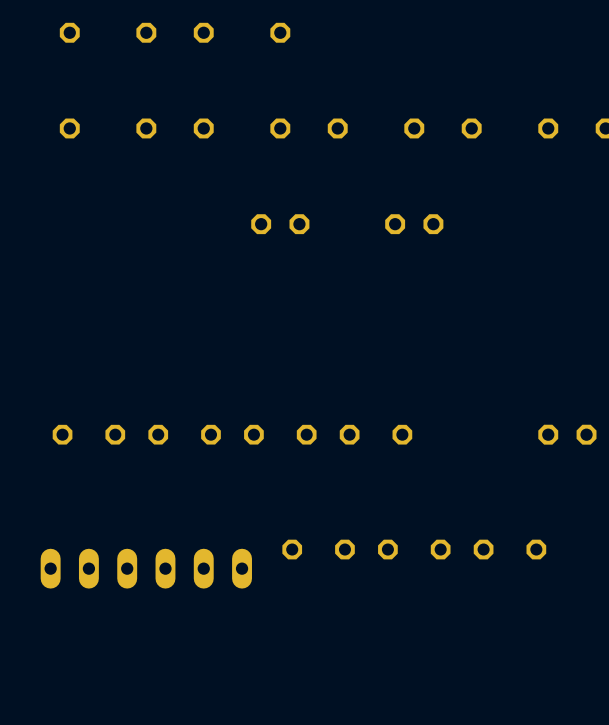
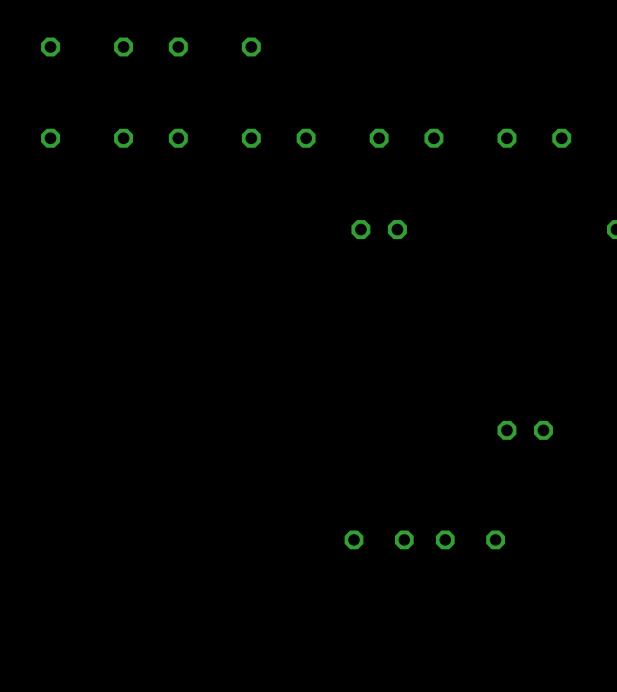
part: (280, 224) -> none
part: (88, 434) -> none
part: (184, 434) -> none
part: (280, 434) -> none
part: (376, 434) -> none
part: (318, 549) -> none
part: (88, 568) -> none
part: (203, 568) -> none

